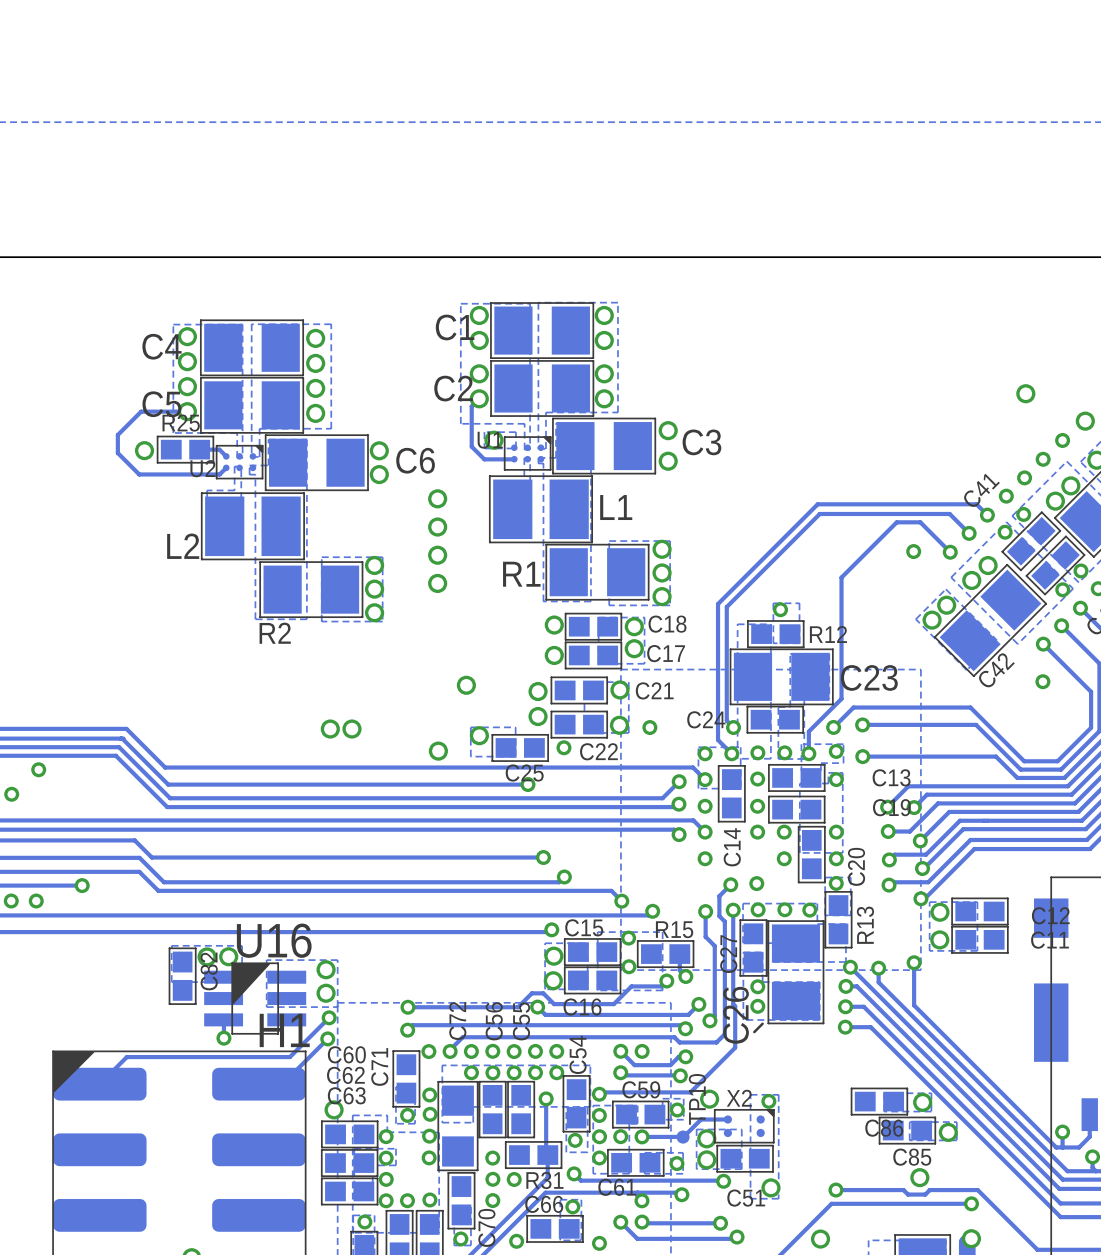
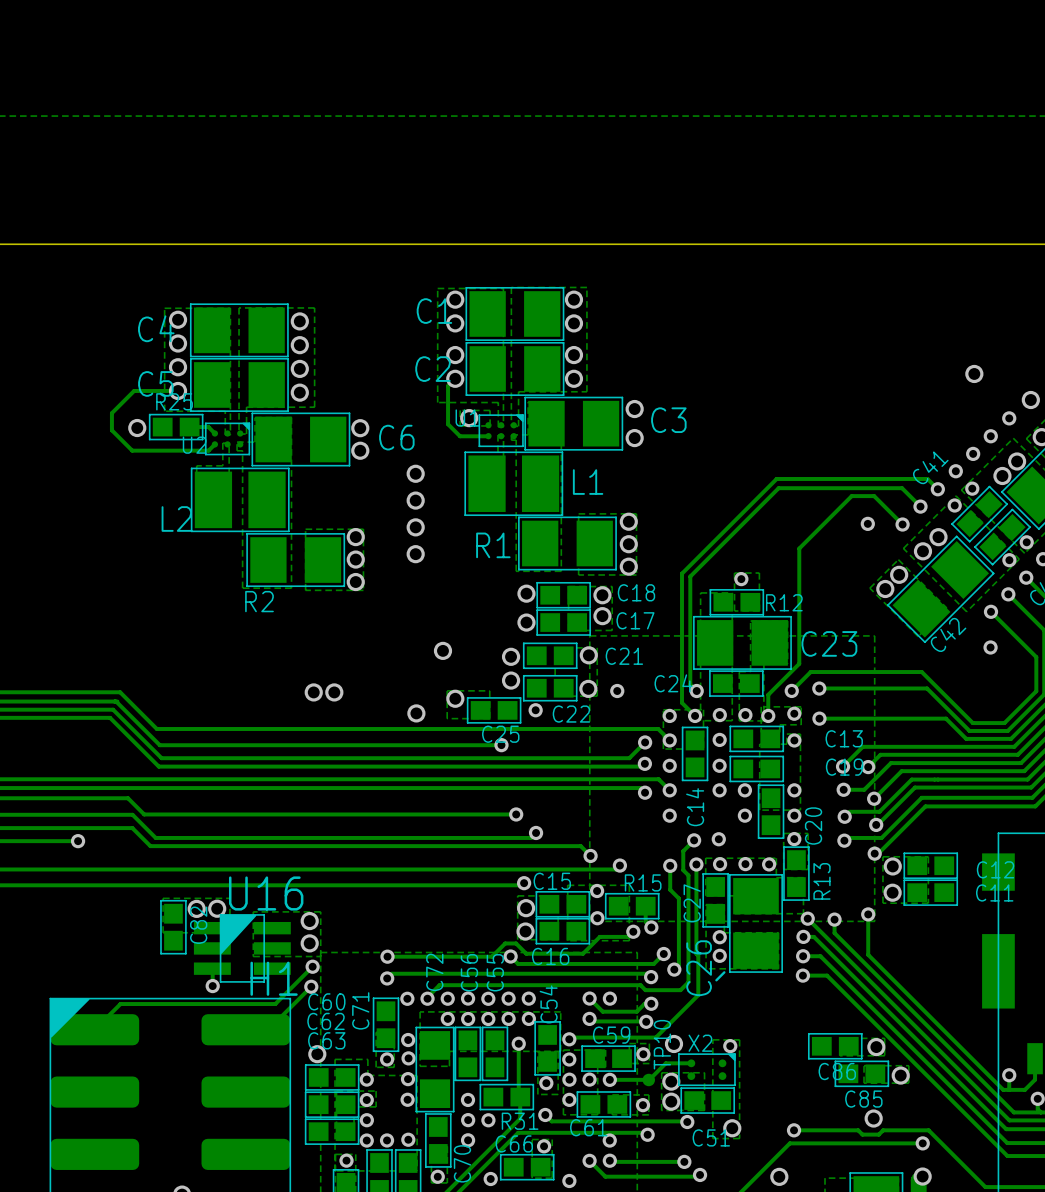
via: (38, 769) -> none
via: (11, 794) -> none
via: (11, 901) -> none
via: (36, 901) -> none

